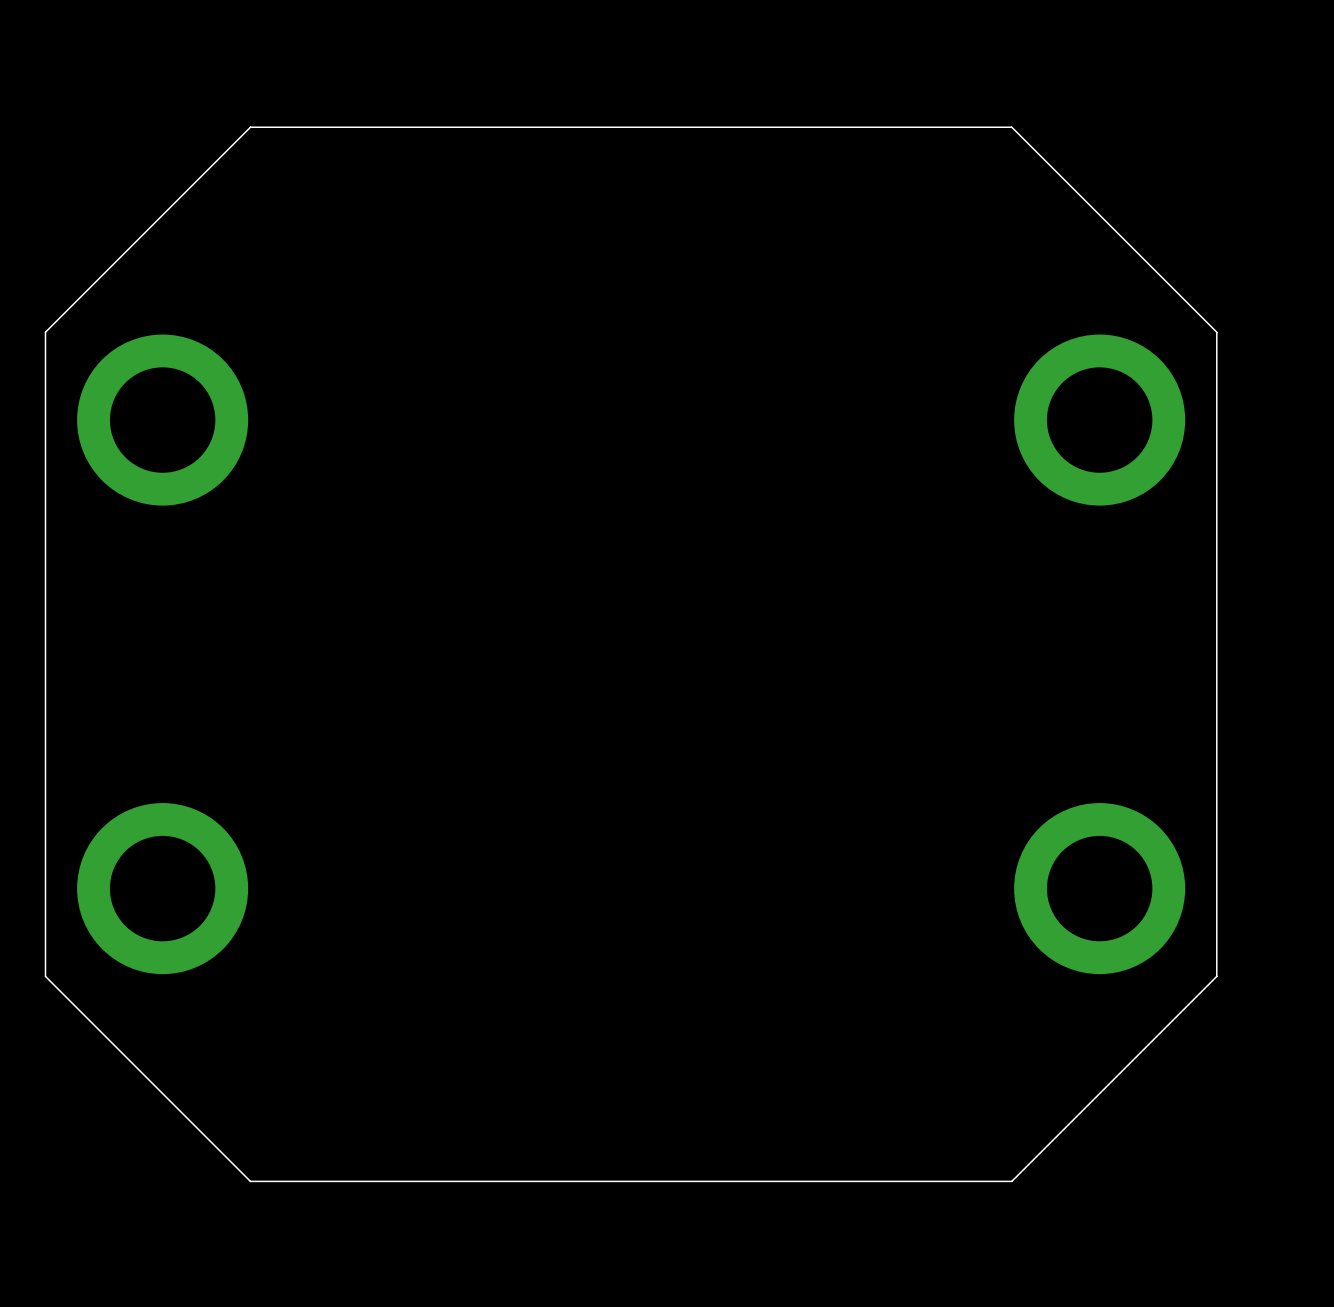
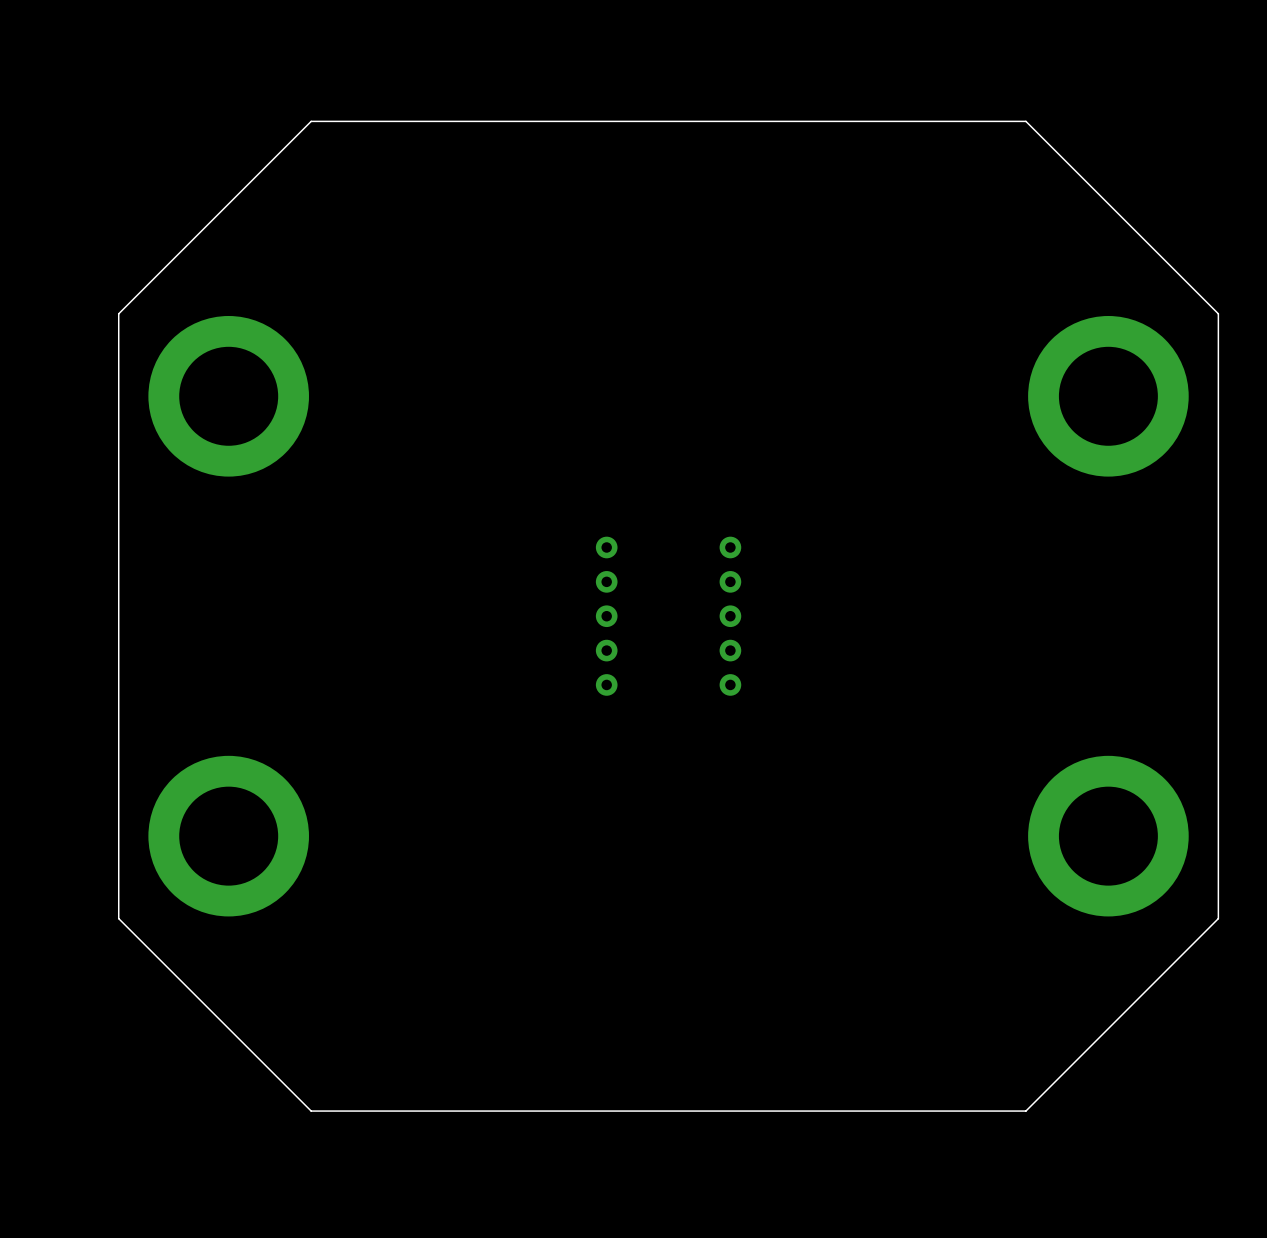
via: none -> (606, 547)
via: none -> (730, 547)
via: none -> (606, 581)
via: none -> (730, 581)
via: none -> (606, 616)
via: none -> (730, 616)
via: none -> (606, 650)
via: none -> (730, 650)
via: none -> (606, 684)
via: none -> (730, 684)

